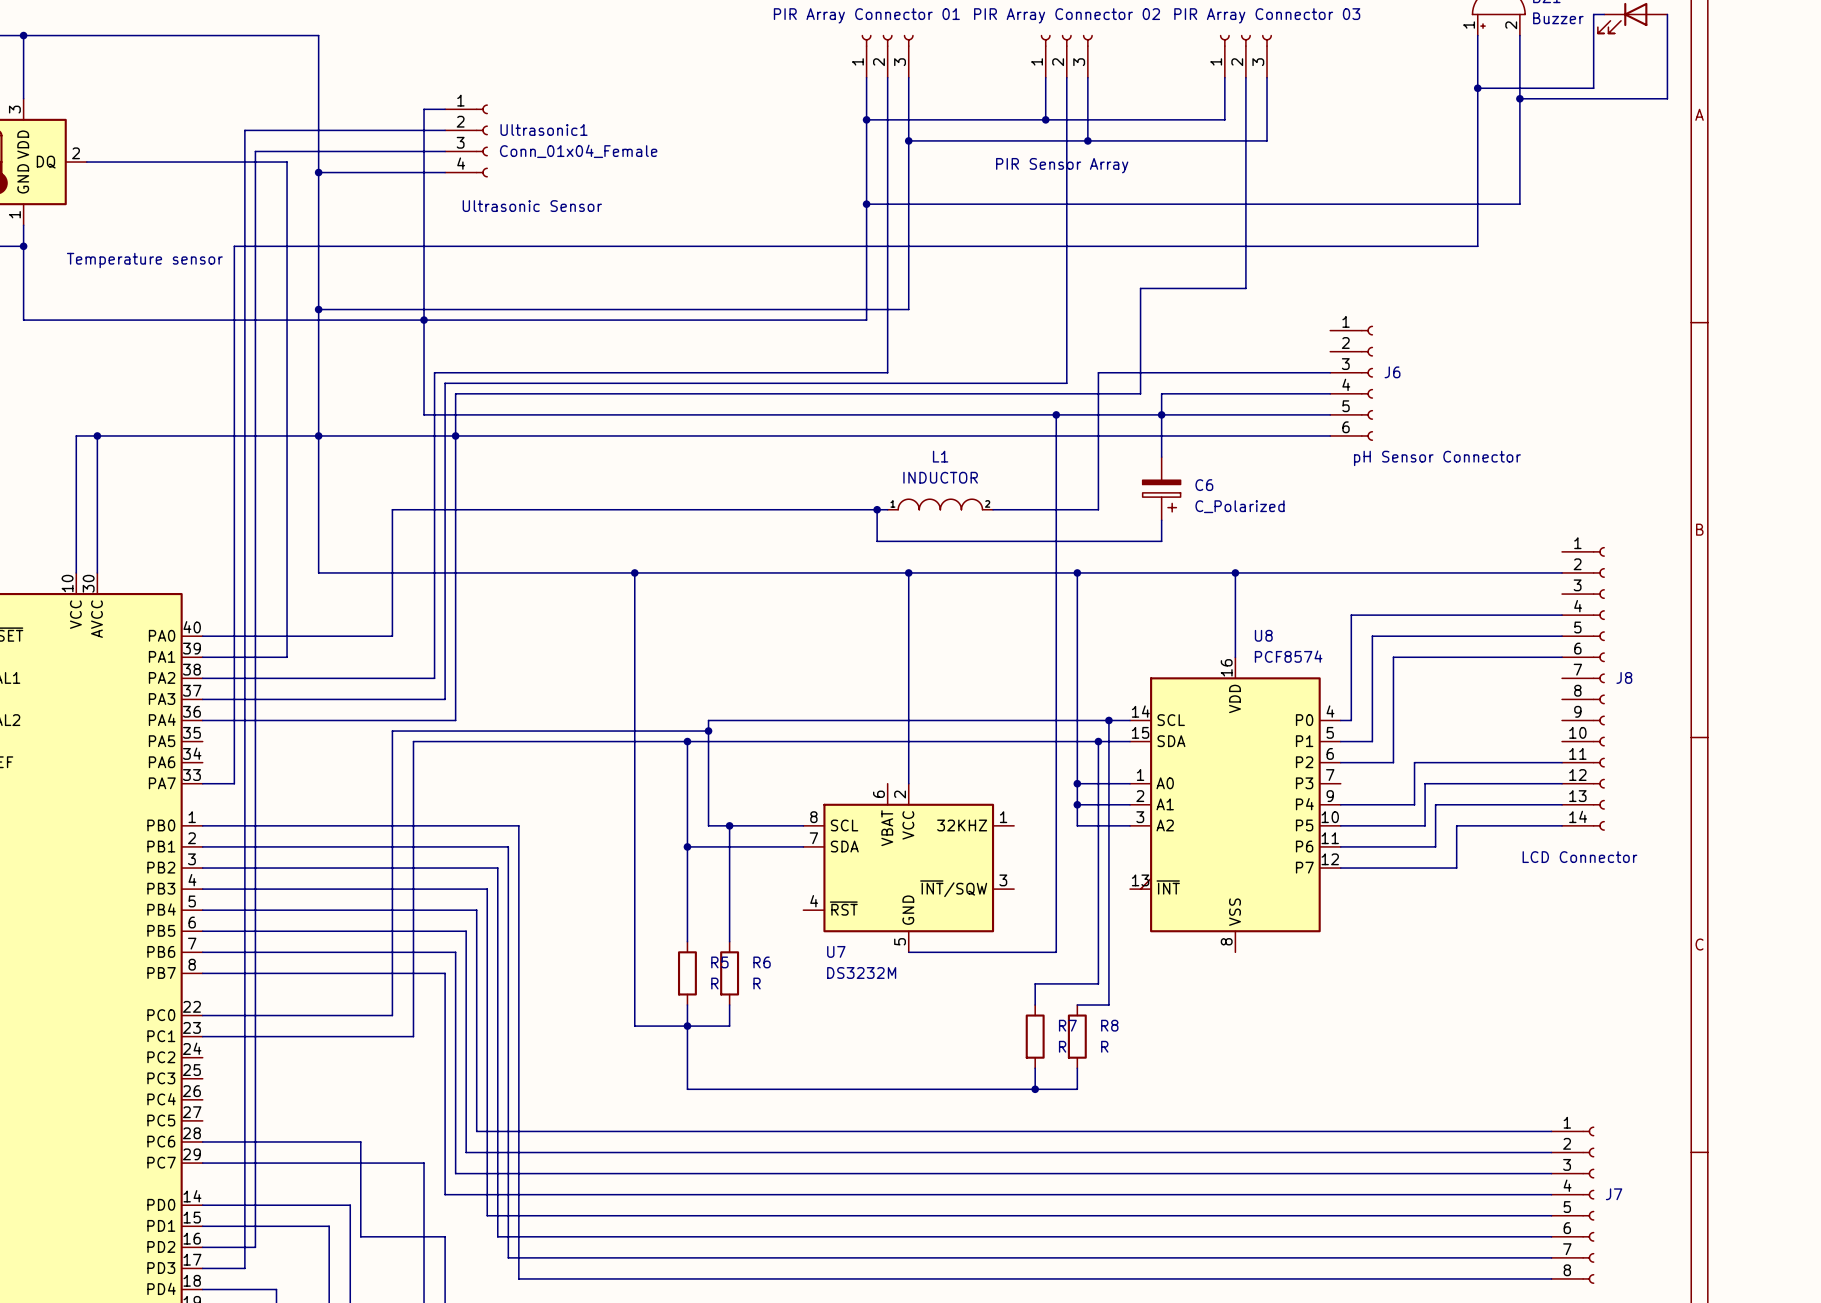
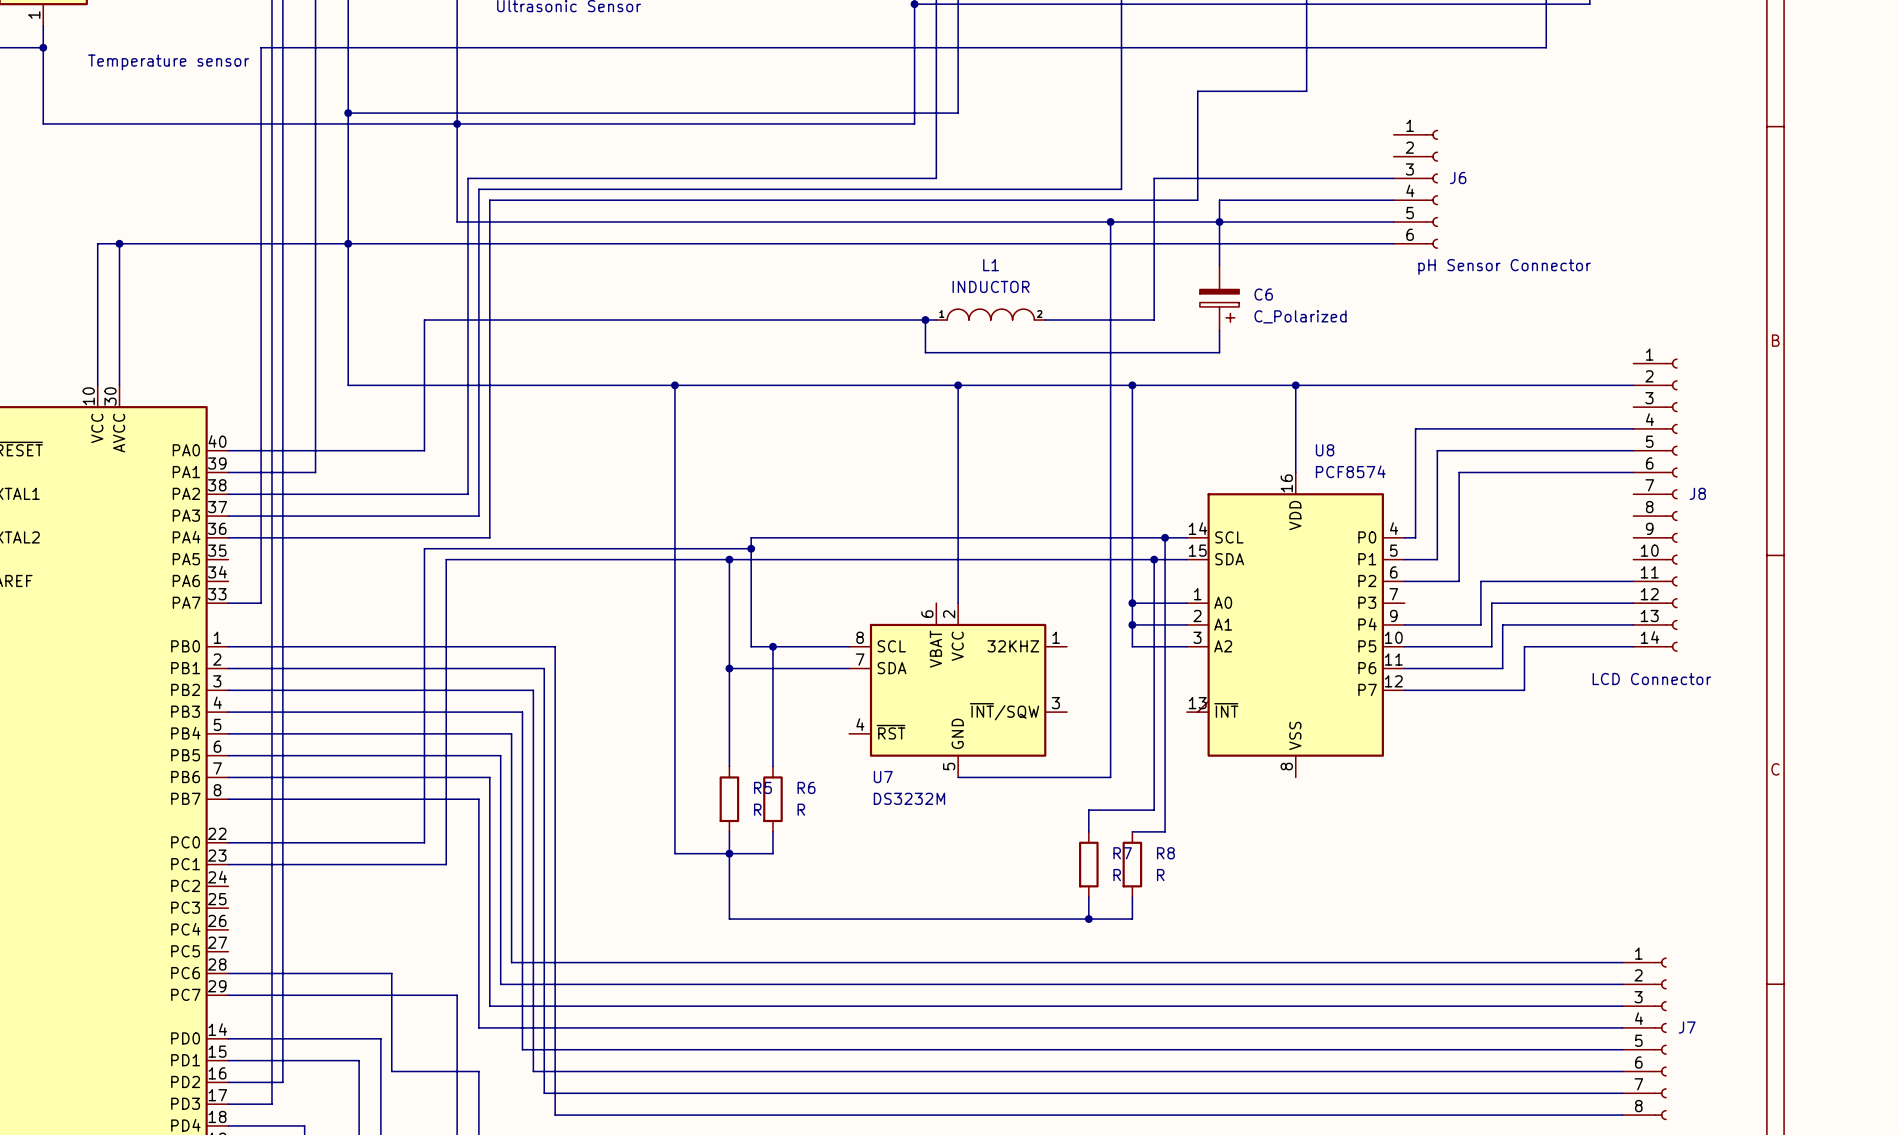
junction: (455, 435) -> none

